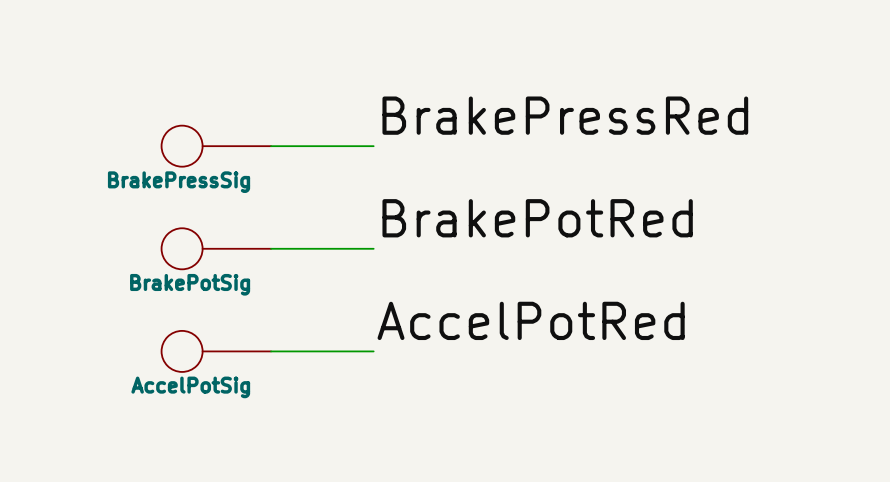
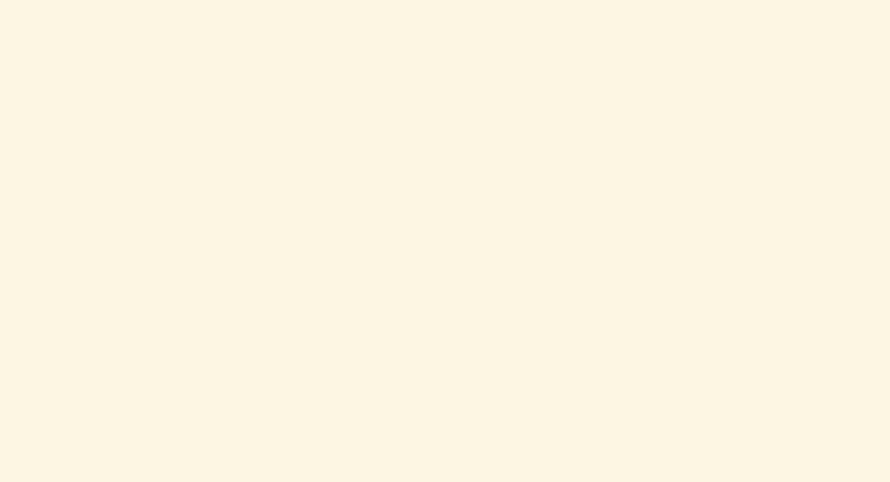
label: BrakePressRed (565, 115) -> none
part: BrakePressSig (216, 146) -> none
wire: (271, 146) (373, 146) -> none
label: BrakePotRed (537, 218) -> none
part: BrakePotSig (216, 248) -> none
wire: (271, 248) (373, 248) -> none
label: AccelPotRed (531, 320) -> none
part: AccelPotSig (216, 351) -> none
wire: (271, 351) (373, 351) -> none

